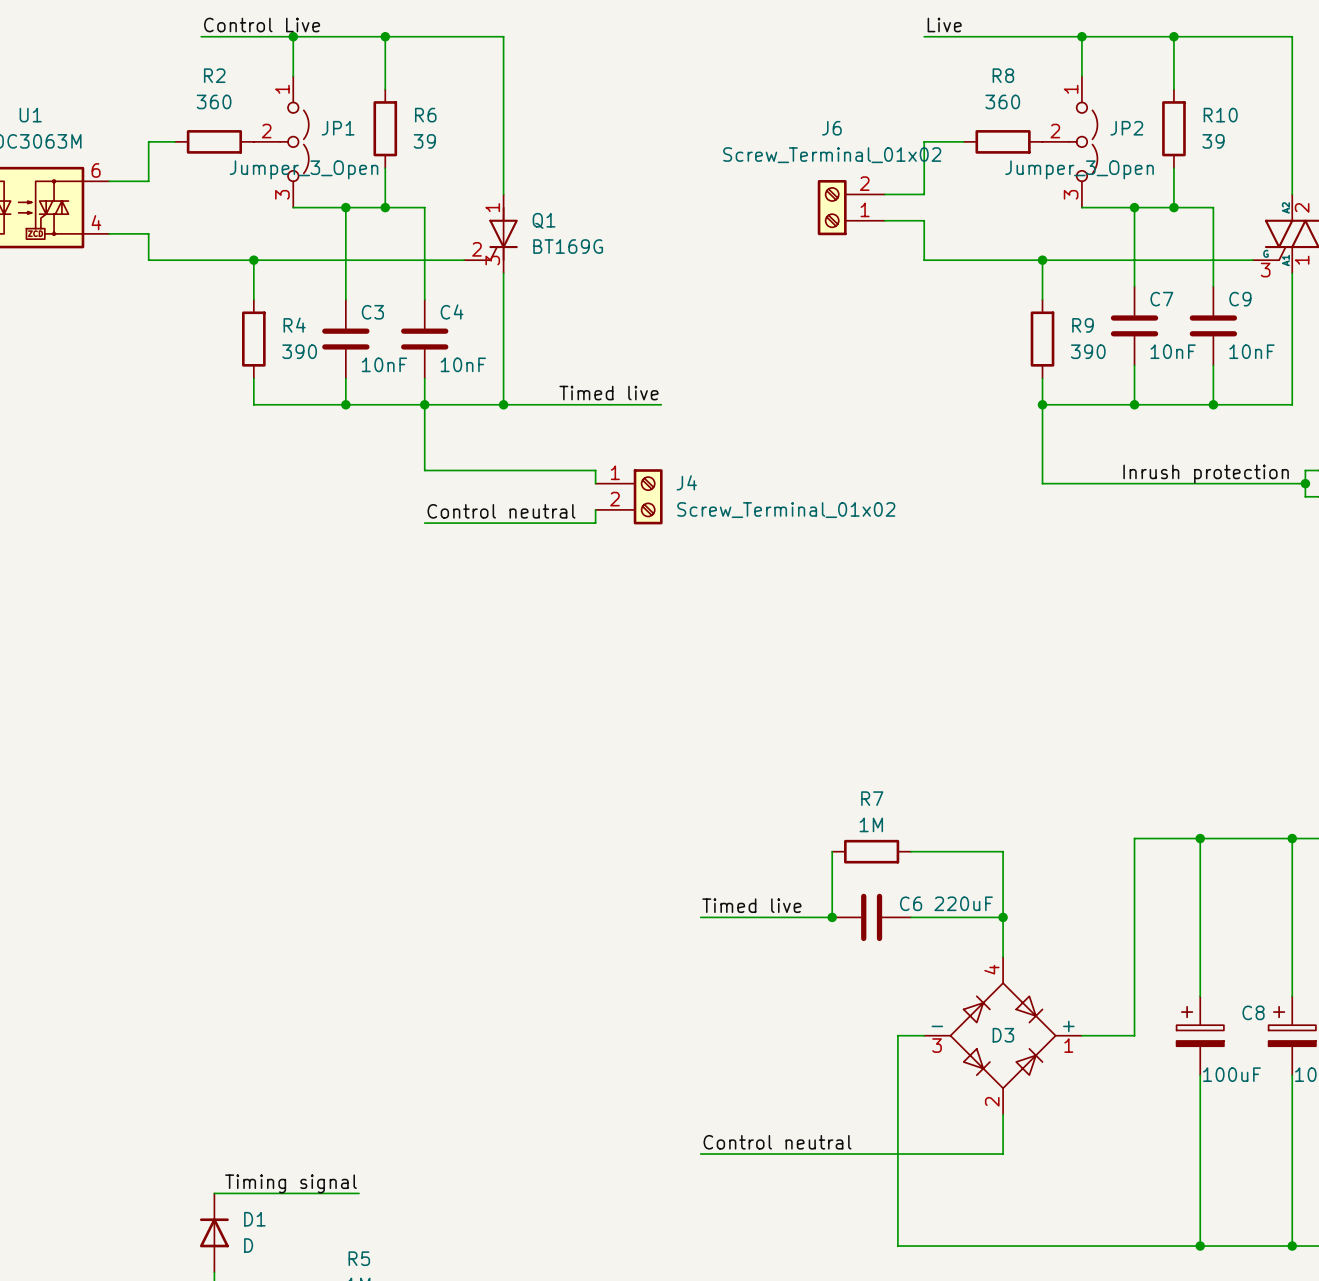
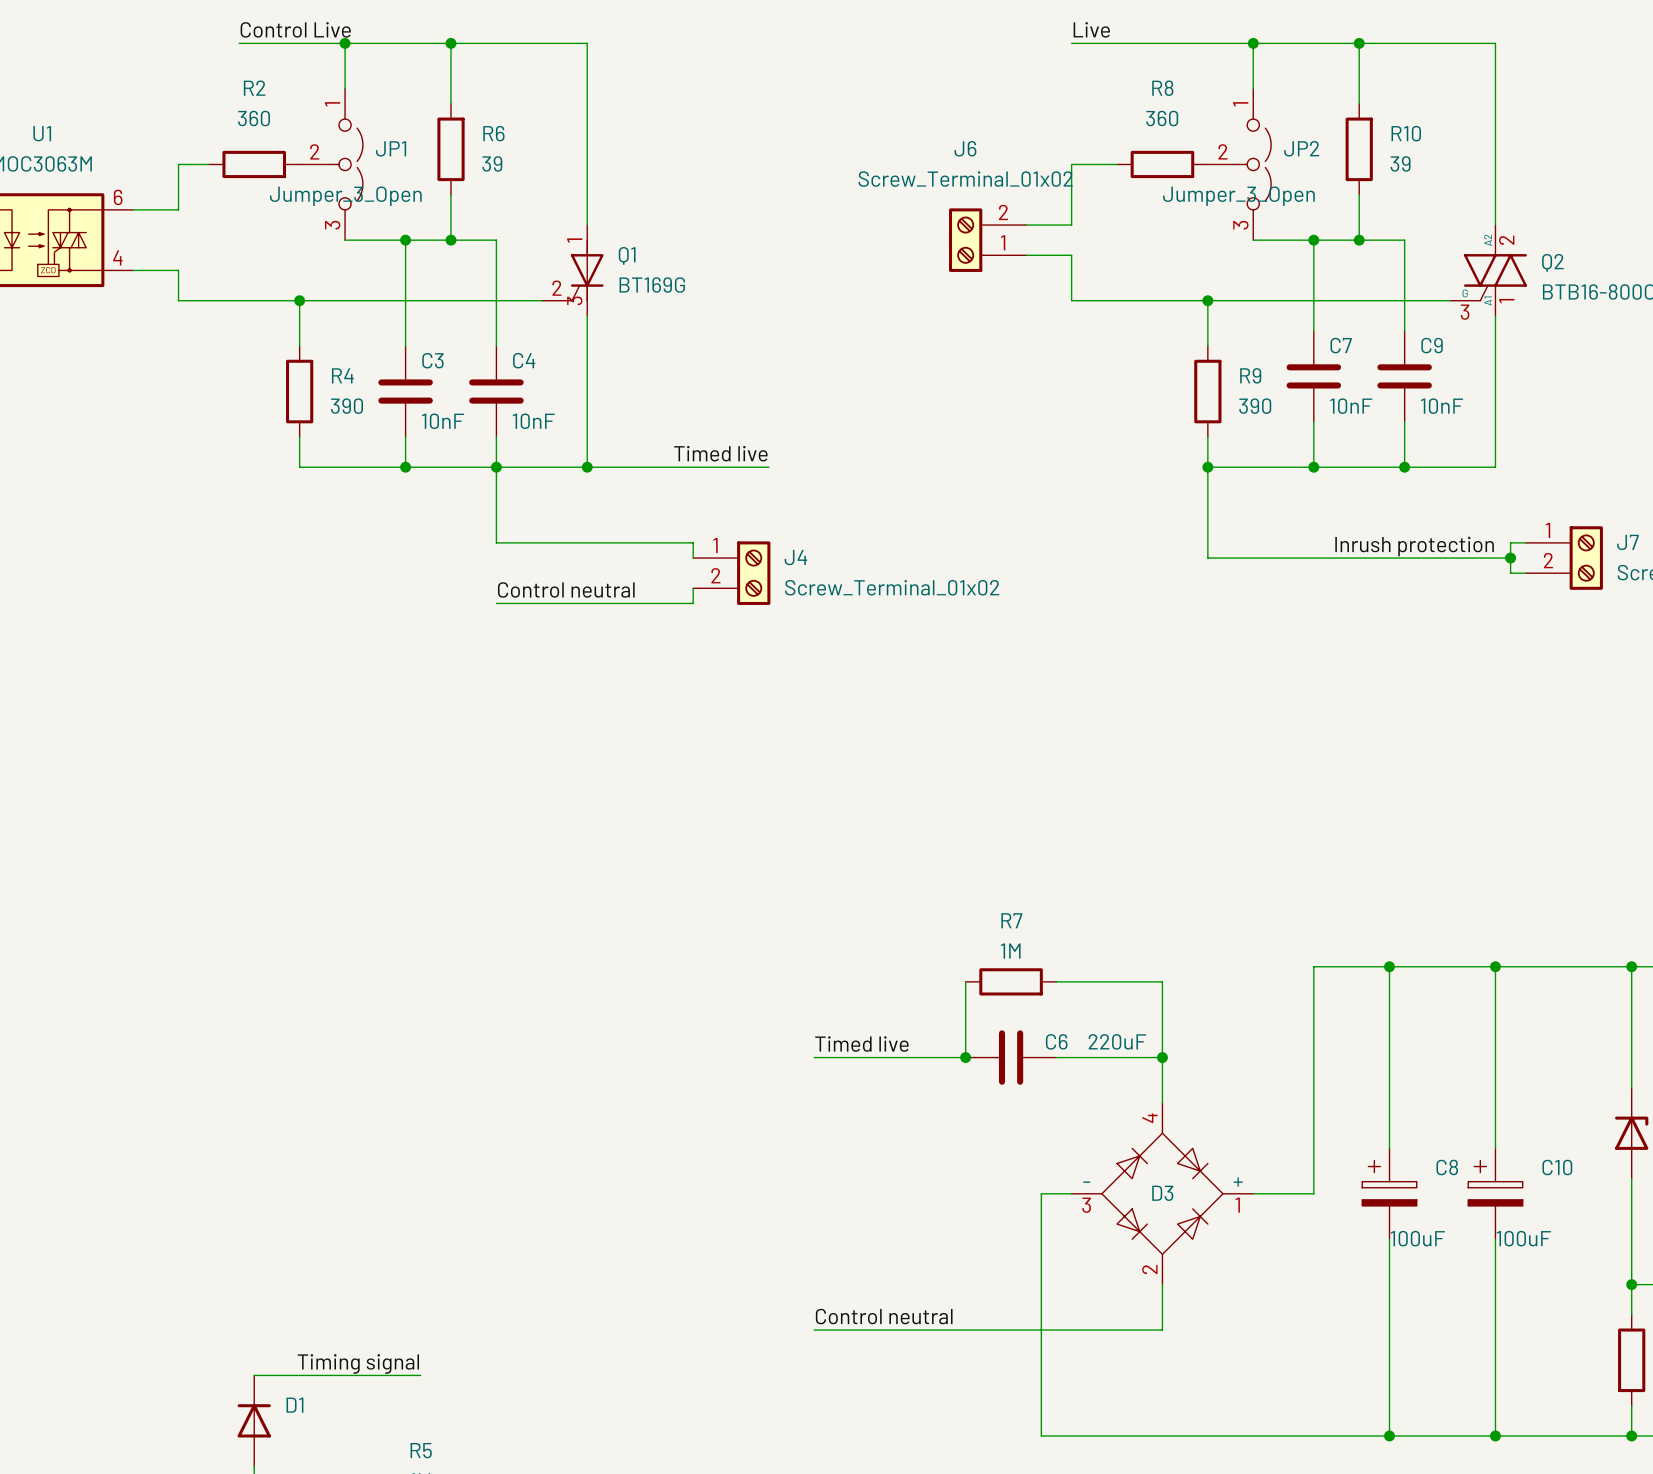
D1 value: D (248, 1245) -> none

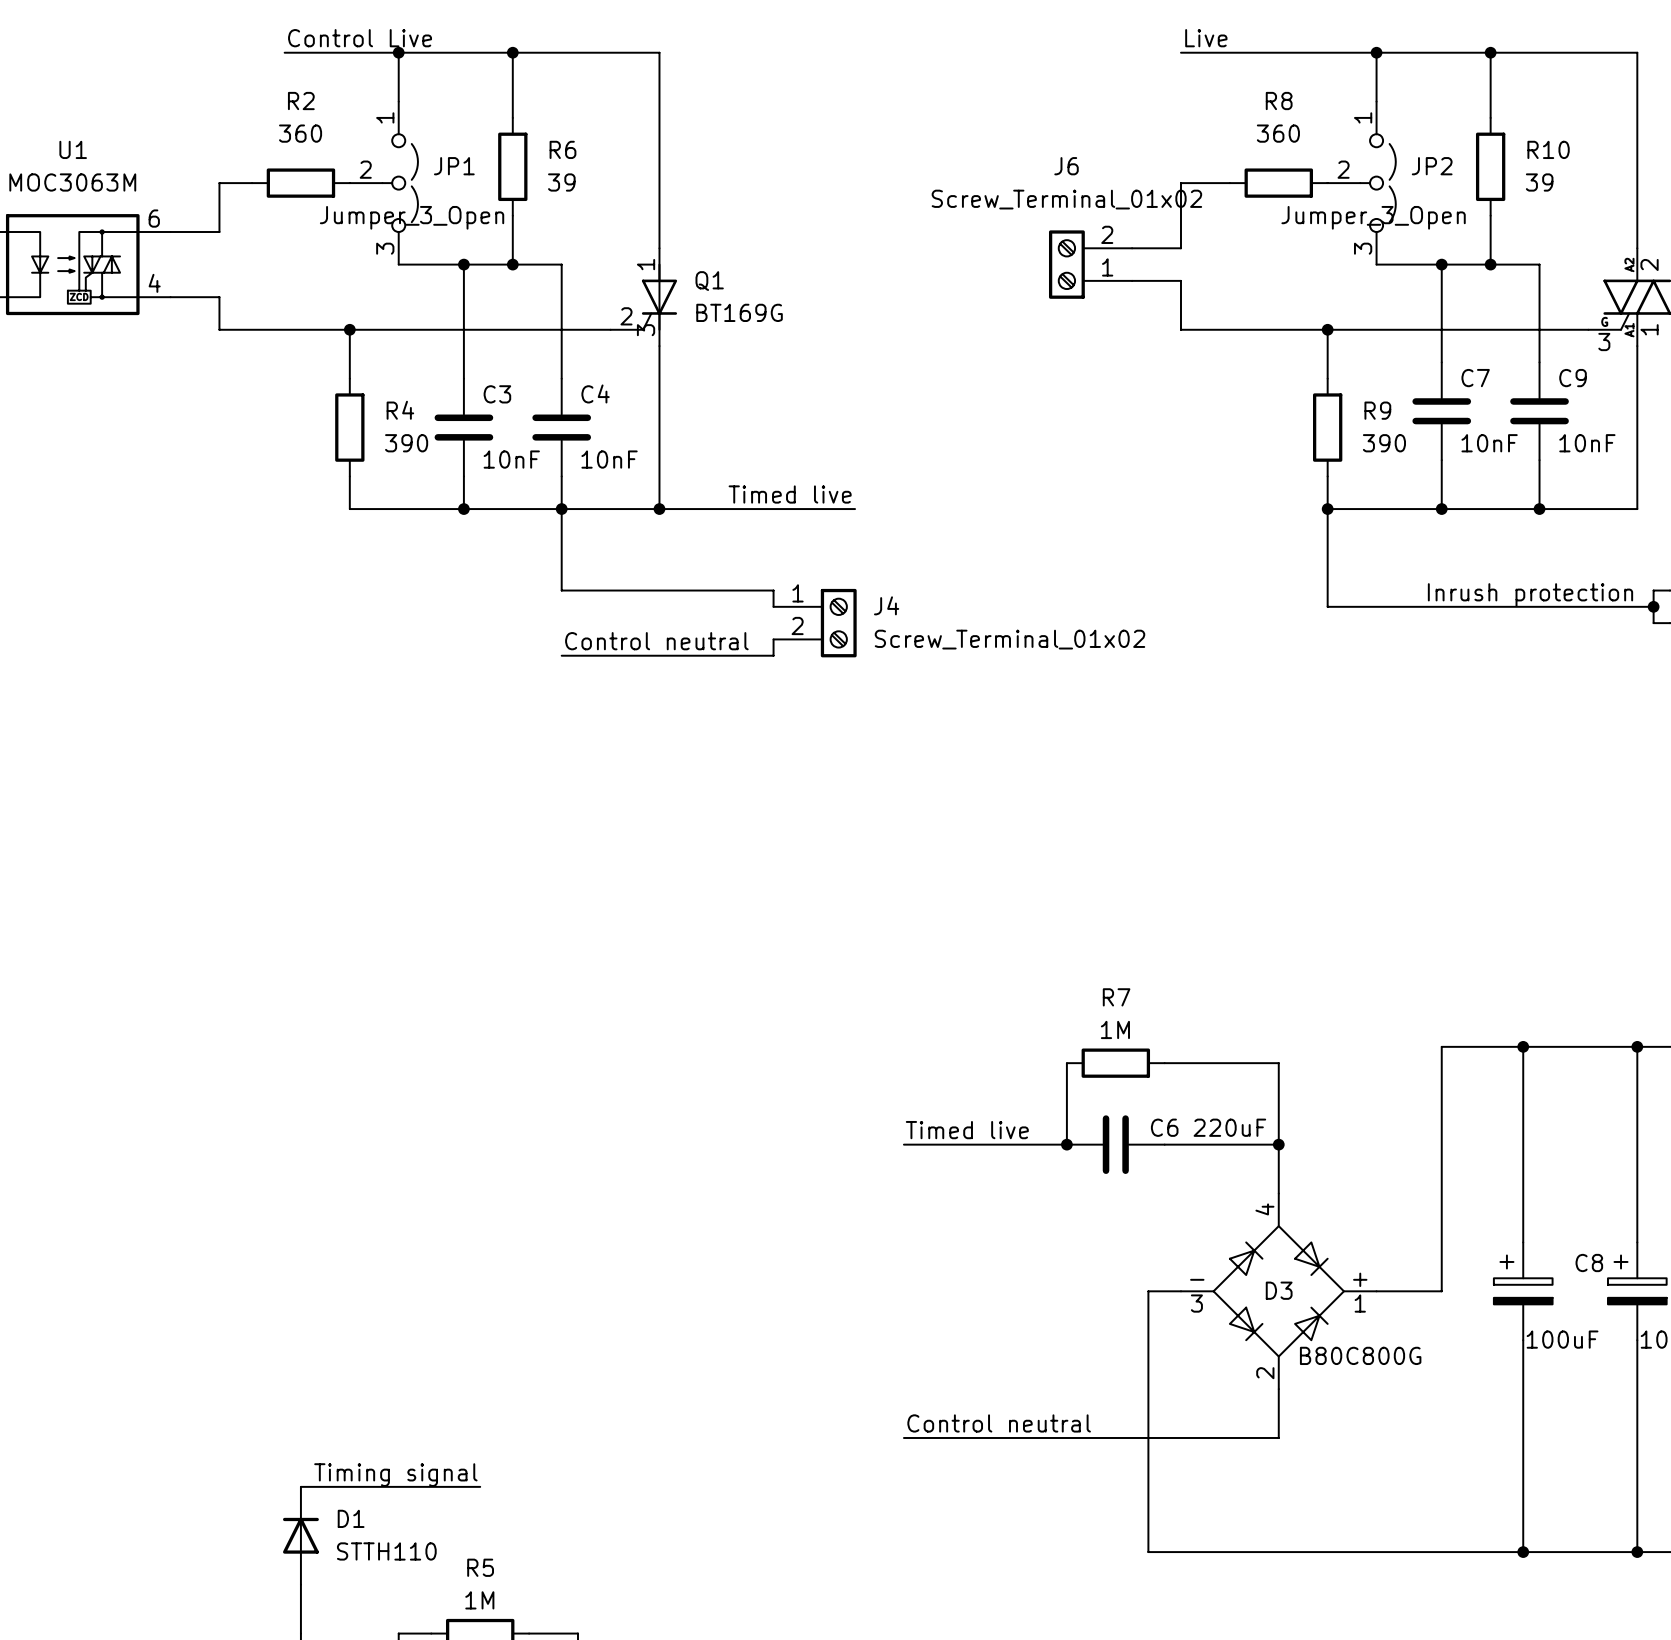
D3 value: none -> B80C800G (1360, 1355)
D1 value: none -> STTH110 (386, 1551)

